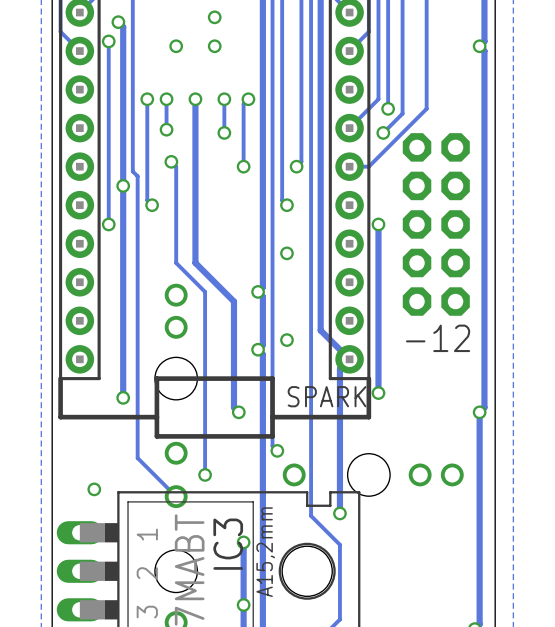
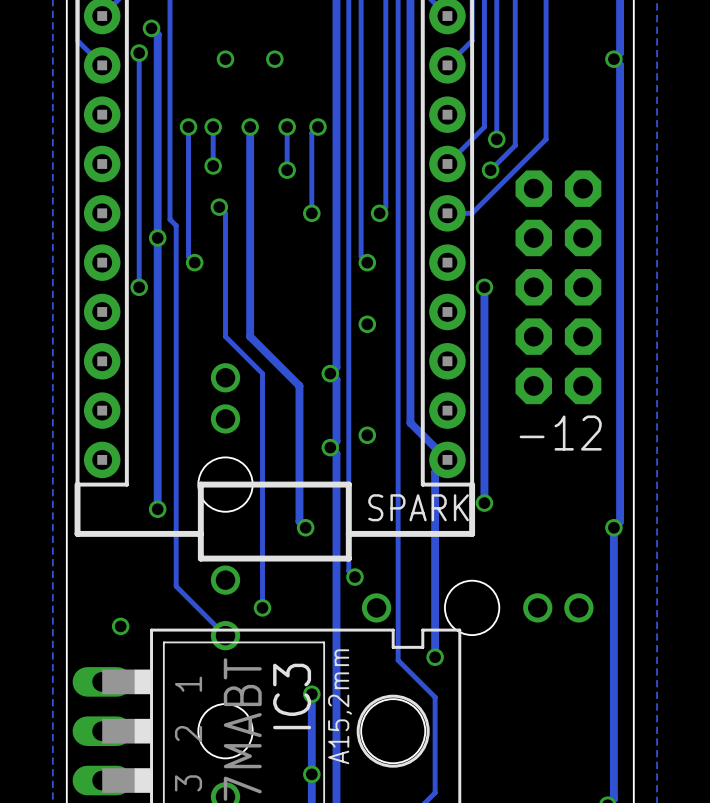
via: (214, 17) -> none

